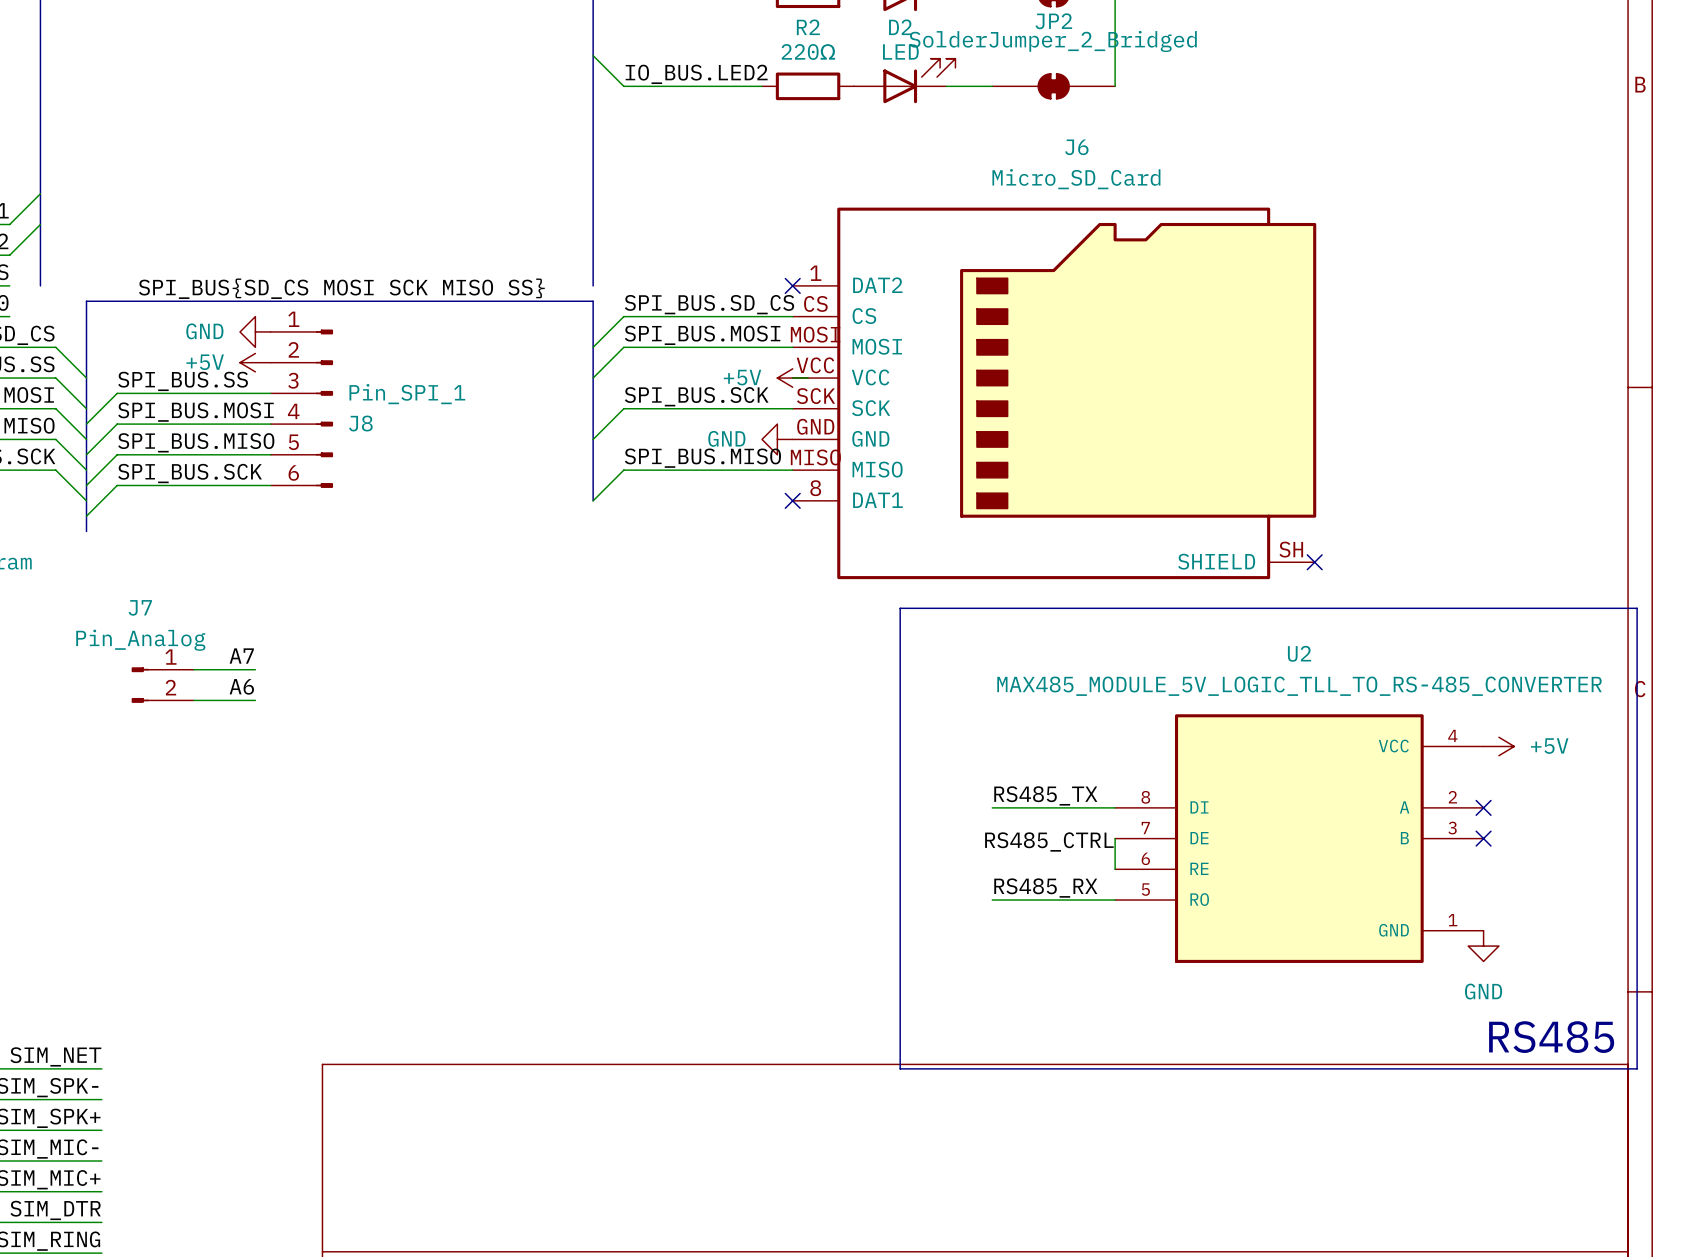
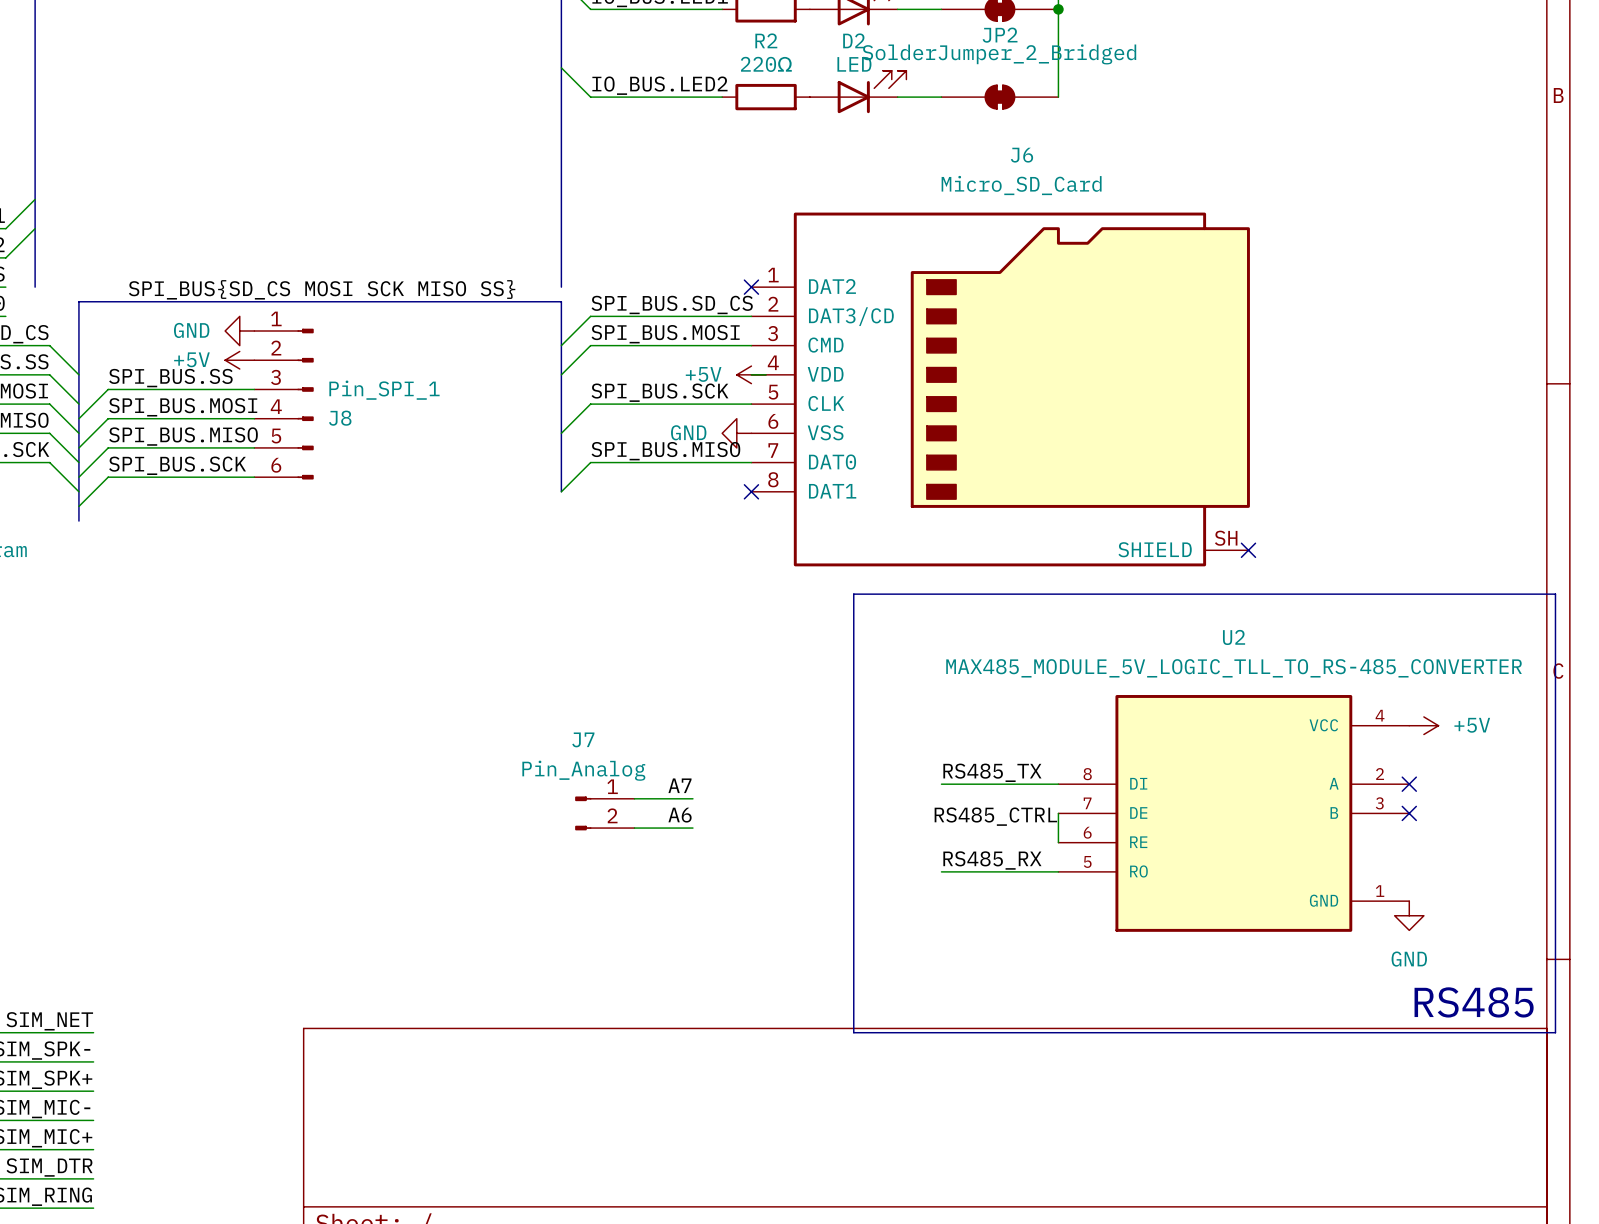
J6 symbol: [792, 207, 1317, 580] -> [751, 212, 1250, 567]
label: A7 (241, 656) -> none
wire: (193, 669) (255, 669) -> none
J7 position: (162, 685) -> (604, 813)
label: A6 (241, 686) -> none
wire: (193, 700) (255, 700) -> none
label: none -> A7 (679, 785)
wire: none -> (634, 798) (692, 798)
label: none -> A6 (680, 815)
wire: none -> (634, 828) (692, 828)

